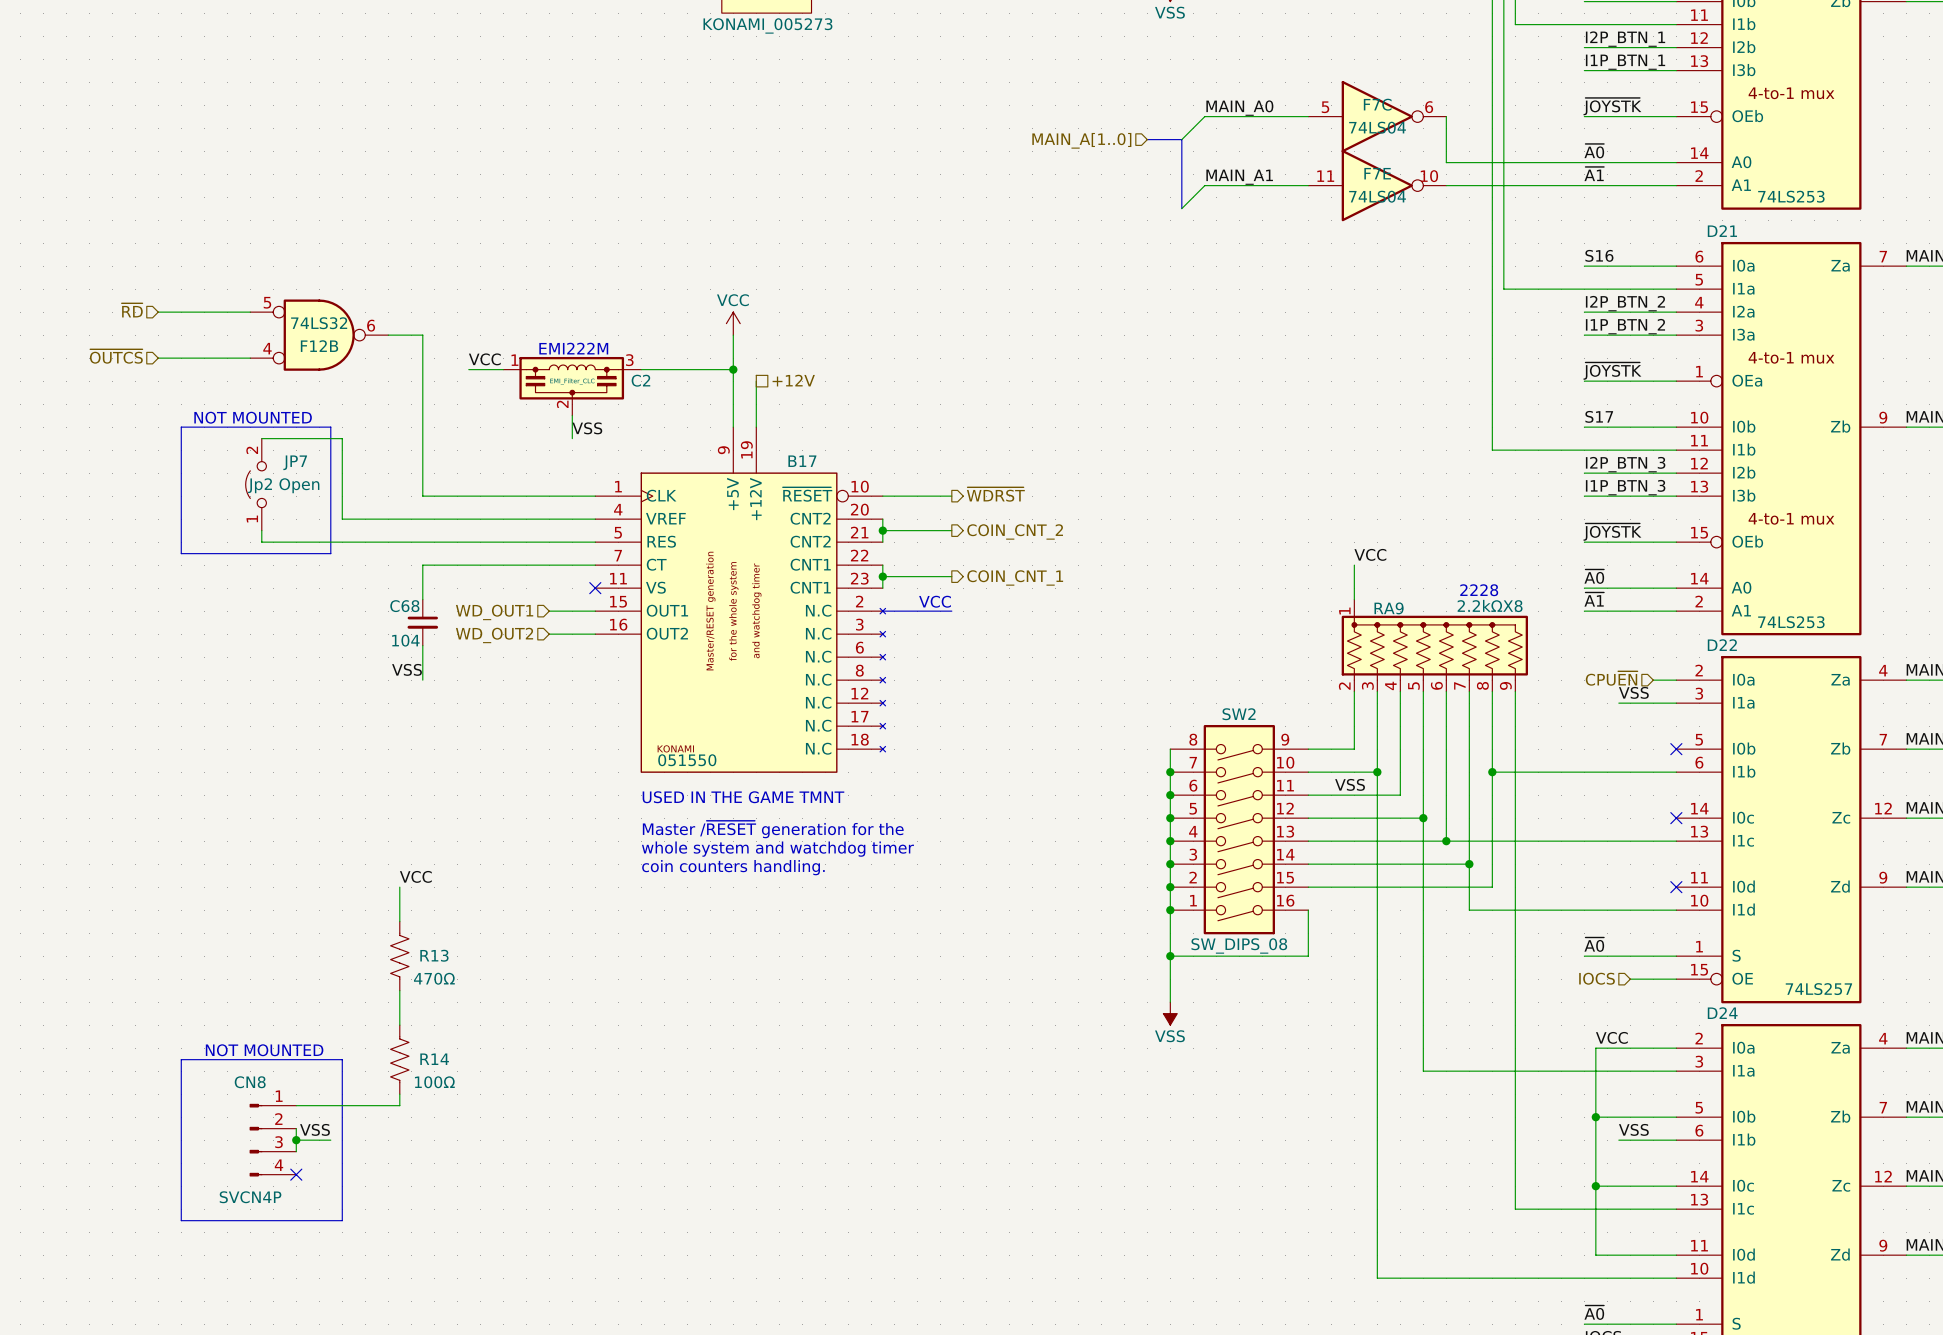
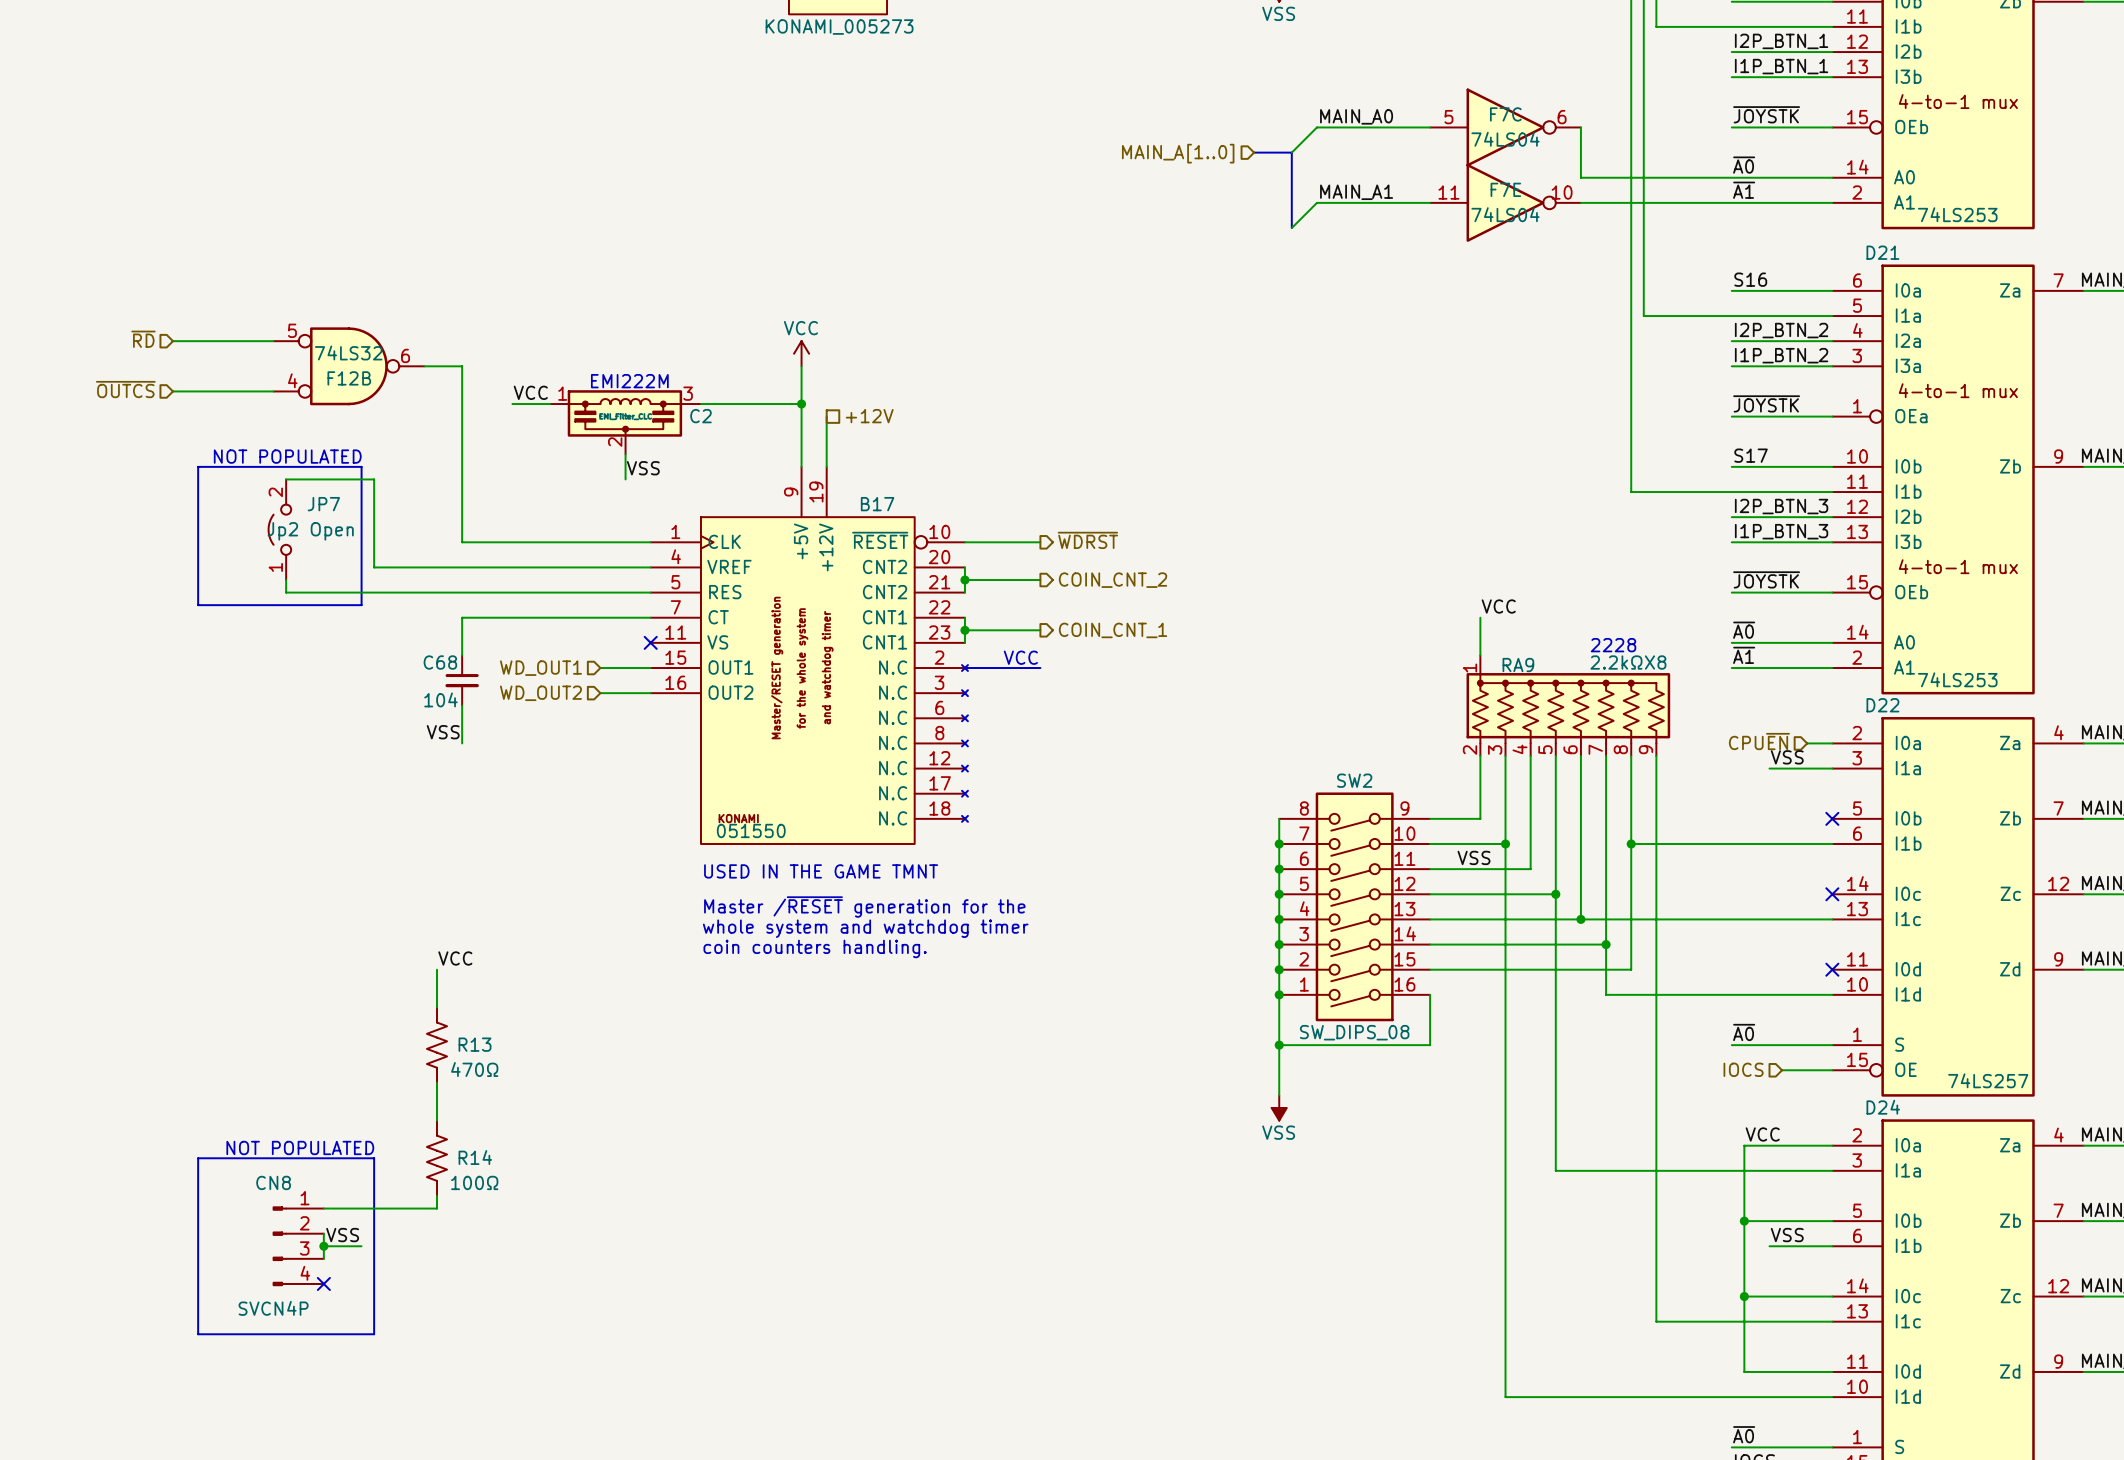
text: NOT MOUNTED (253, 417) -> NOT POPULATED (287, 456)
text: NOT MOUNTED (264, 1050) -> NOT POPULATED (300, 1147)

